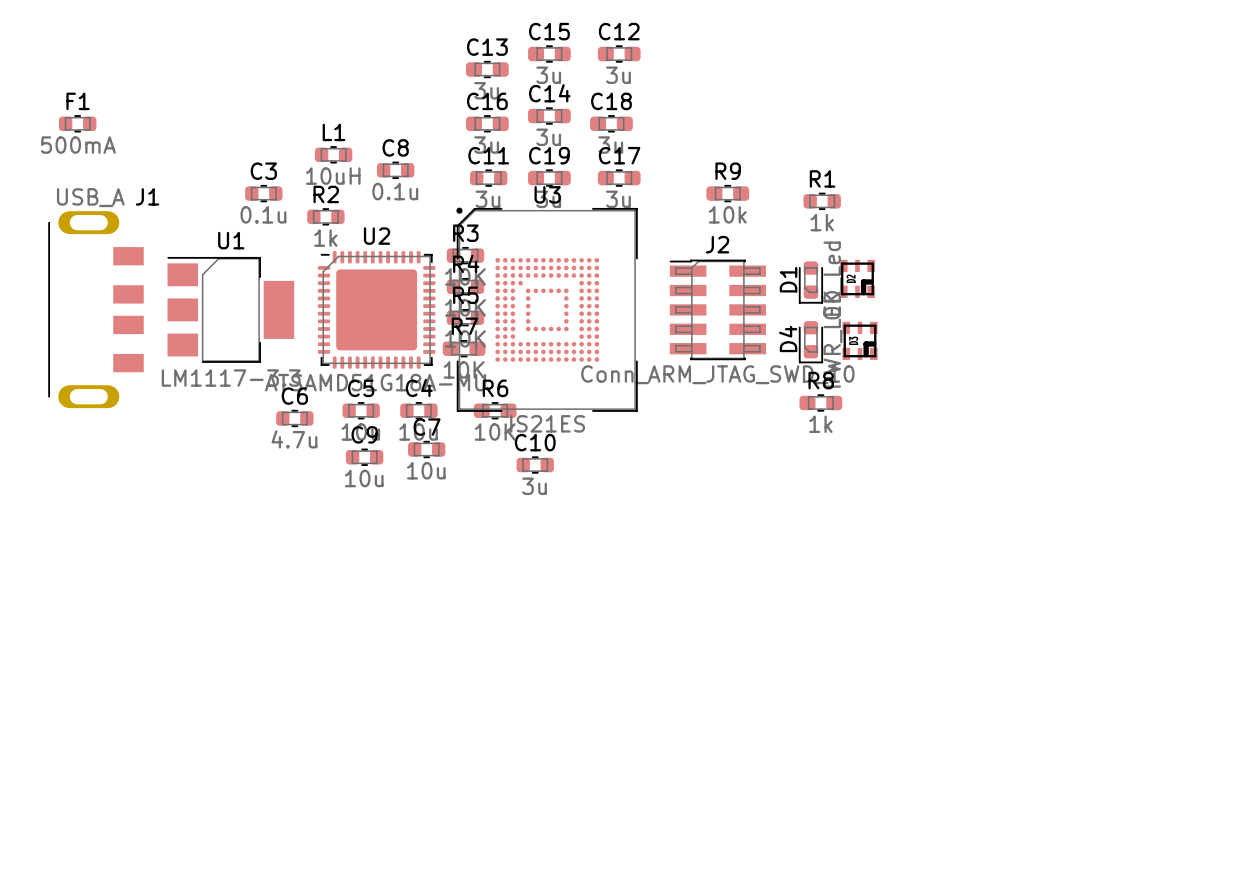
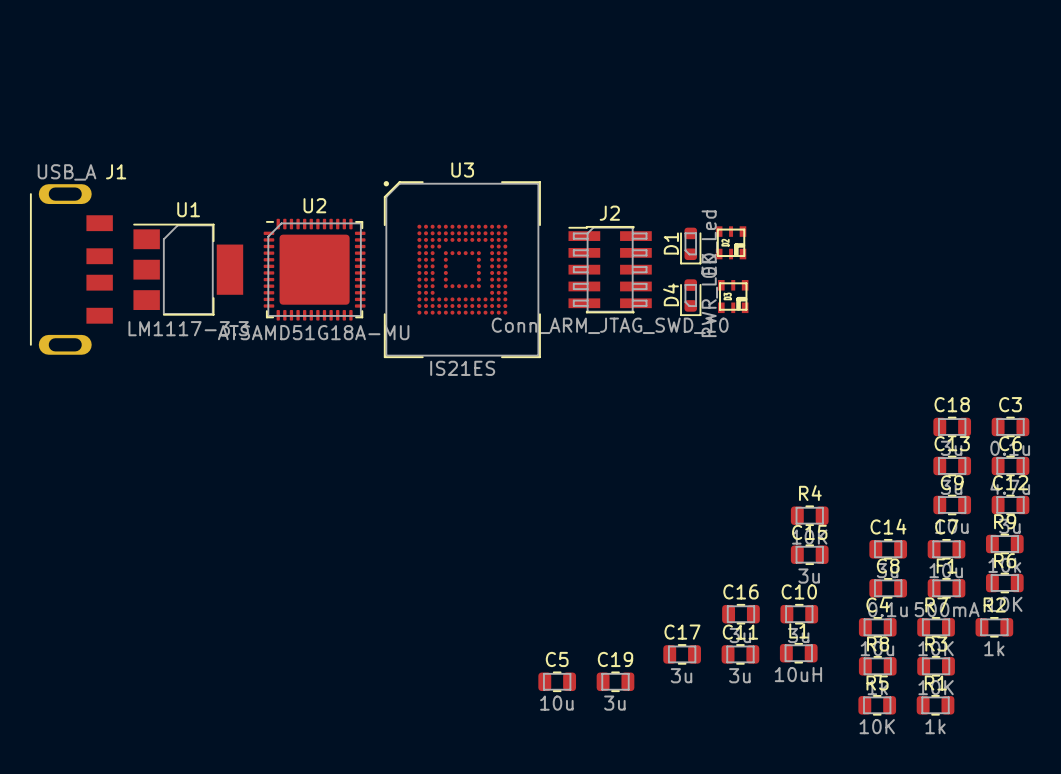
C15 footprint: [528, 45, 571, 63] -> [790, 544, 829, 565]
C12 footprint: [597, 45, 641, 63] -> [991, 494, 1030, 516]
C13 footprint: [466, 60, 509, 79] -> [933, 455, 972, 477]
C14 footprint: [528, 107, 571, 125] -> [869, 539, 908, 560]
F1 footprint: [58, 115, 97, 133] -> [927, 578, 966, 599]
C16 footprint: [466, 115, 509, 133] -> [722, 604, 760, 625]
C18 footprint: [590, 115, 633, 133] -> [933, 416, 972, 438]
L1 footprint: [314, 146, 353, 164] -> [779, 643, 818, 664]
C8 footprint: [376, 161, 415, 180] -> [869, 578, 908, 599]
C11 footprint: [470, 169, 508, 187] -> [721, 644, 760, 665]
C19 footprint: [528, 169, 571, 187] -> [596, 671, 635, 692]
C17 footprint: [597, 169, 641, 187] -> [663, 644, 701, 665]
C3 footprint: [245, 184, 283, 203] -> [991, 416, 1030, 438]
R9 footprint: [706, 184, 750, 203] -> [985, 533, 1024, 555]
R1 footprint: [803, 192, 841, 211] -> [916, 695, 955, 716]
R2 footprint: [307, 208, 345, 226] -> [975, 617, 1014, 638]
R3 footprint: [446, 246, 485, 265] -> [917, 656, 955, 677]
R4 footprint: [446, 277, 485, 296] -> [790, 505, 829, 526]
R5 footprint: [446, 308, 485, 327] -> [858, 695, 897, 716]
R7 footprint: [442, 339, 486, 358] -> [917, 617, 955, 638]
R8 footprint: [799, 394, 843, 412] -> [858, 656, 897, 677]
C5 footprint: [342, 402, 380, 420] -> [538, 671, 577, 692]
C4 footprint: [400, 402, 438, 420] -> [858, 617, 897, 638]
R6 footprint: [473, 402, 517, 420] -> [985, 572, 1024, 594]
C6 footprint: [276, 409, 314, 428] -> [991, 455, 1030, 477]
C7 footprint: [407, 440, 446, 459] -> [927, 539, 966, 560]
C9 footprint: [345, 448, 384, 466] -> [933, 494, 972, 516]
C10 footprint: [516, 456, 554, 474] -> [780, 604, 819, 625]

